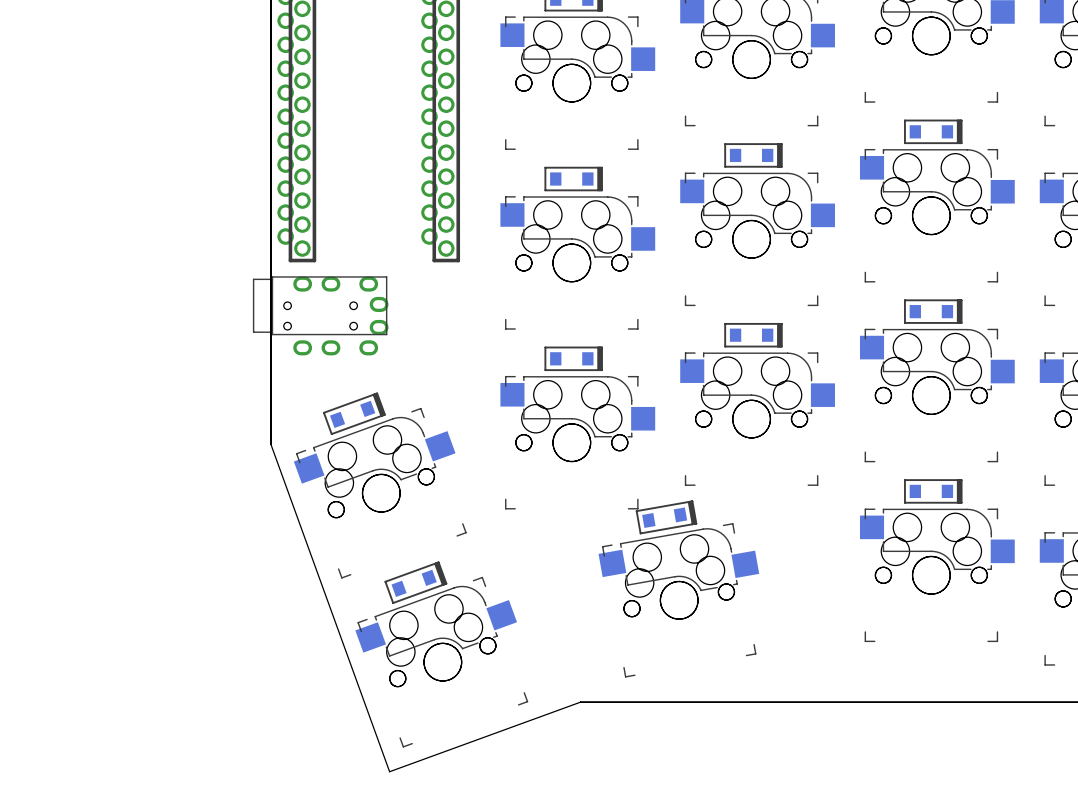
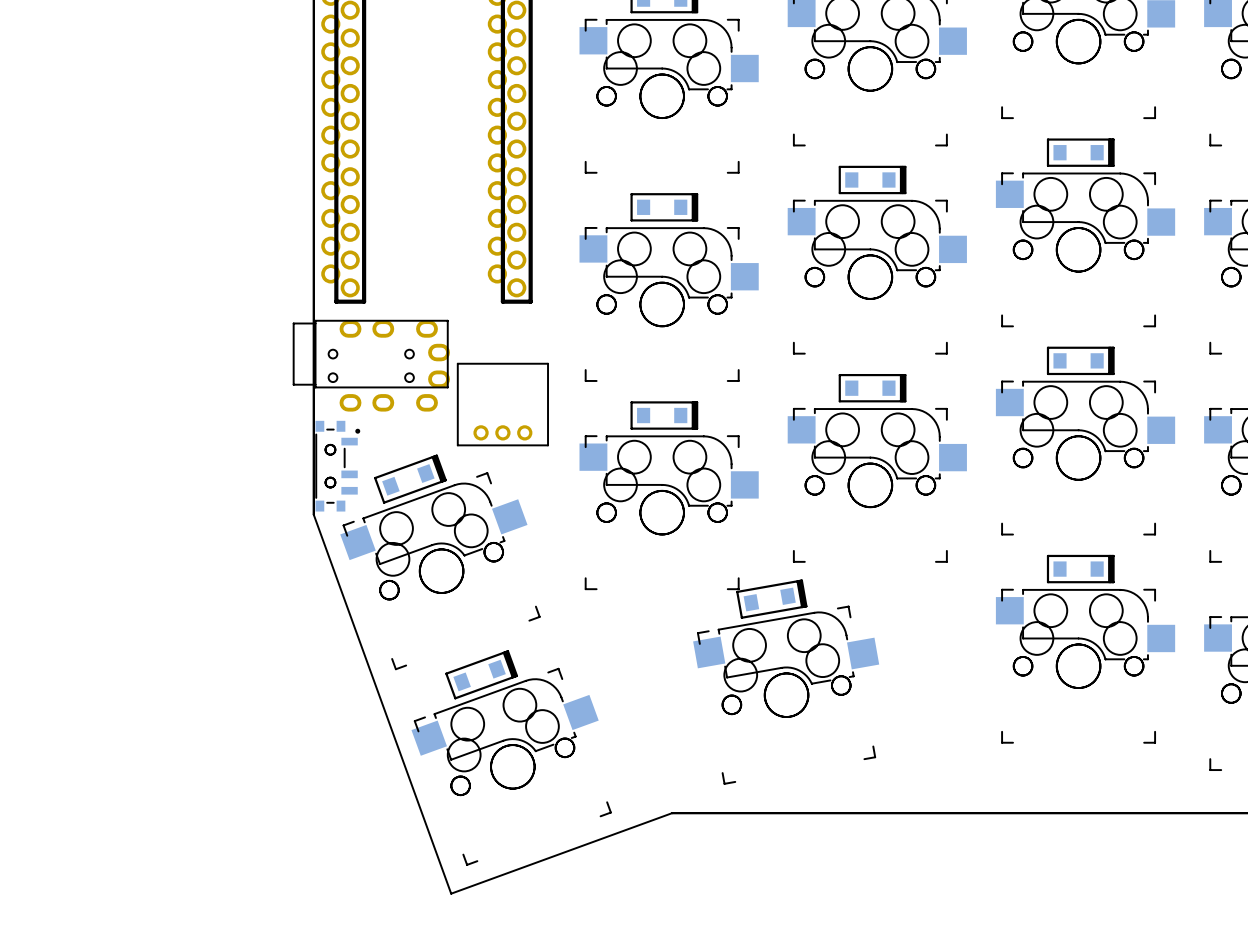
part: none -> (502, 404)
part: none -> (330, 466)
part: none -> (337, 466)

